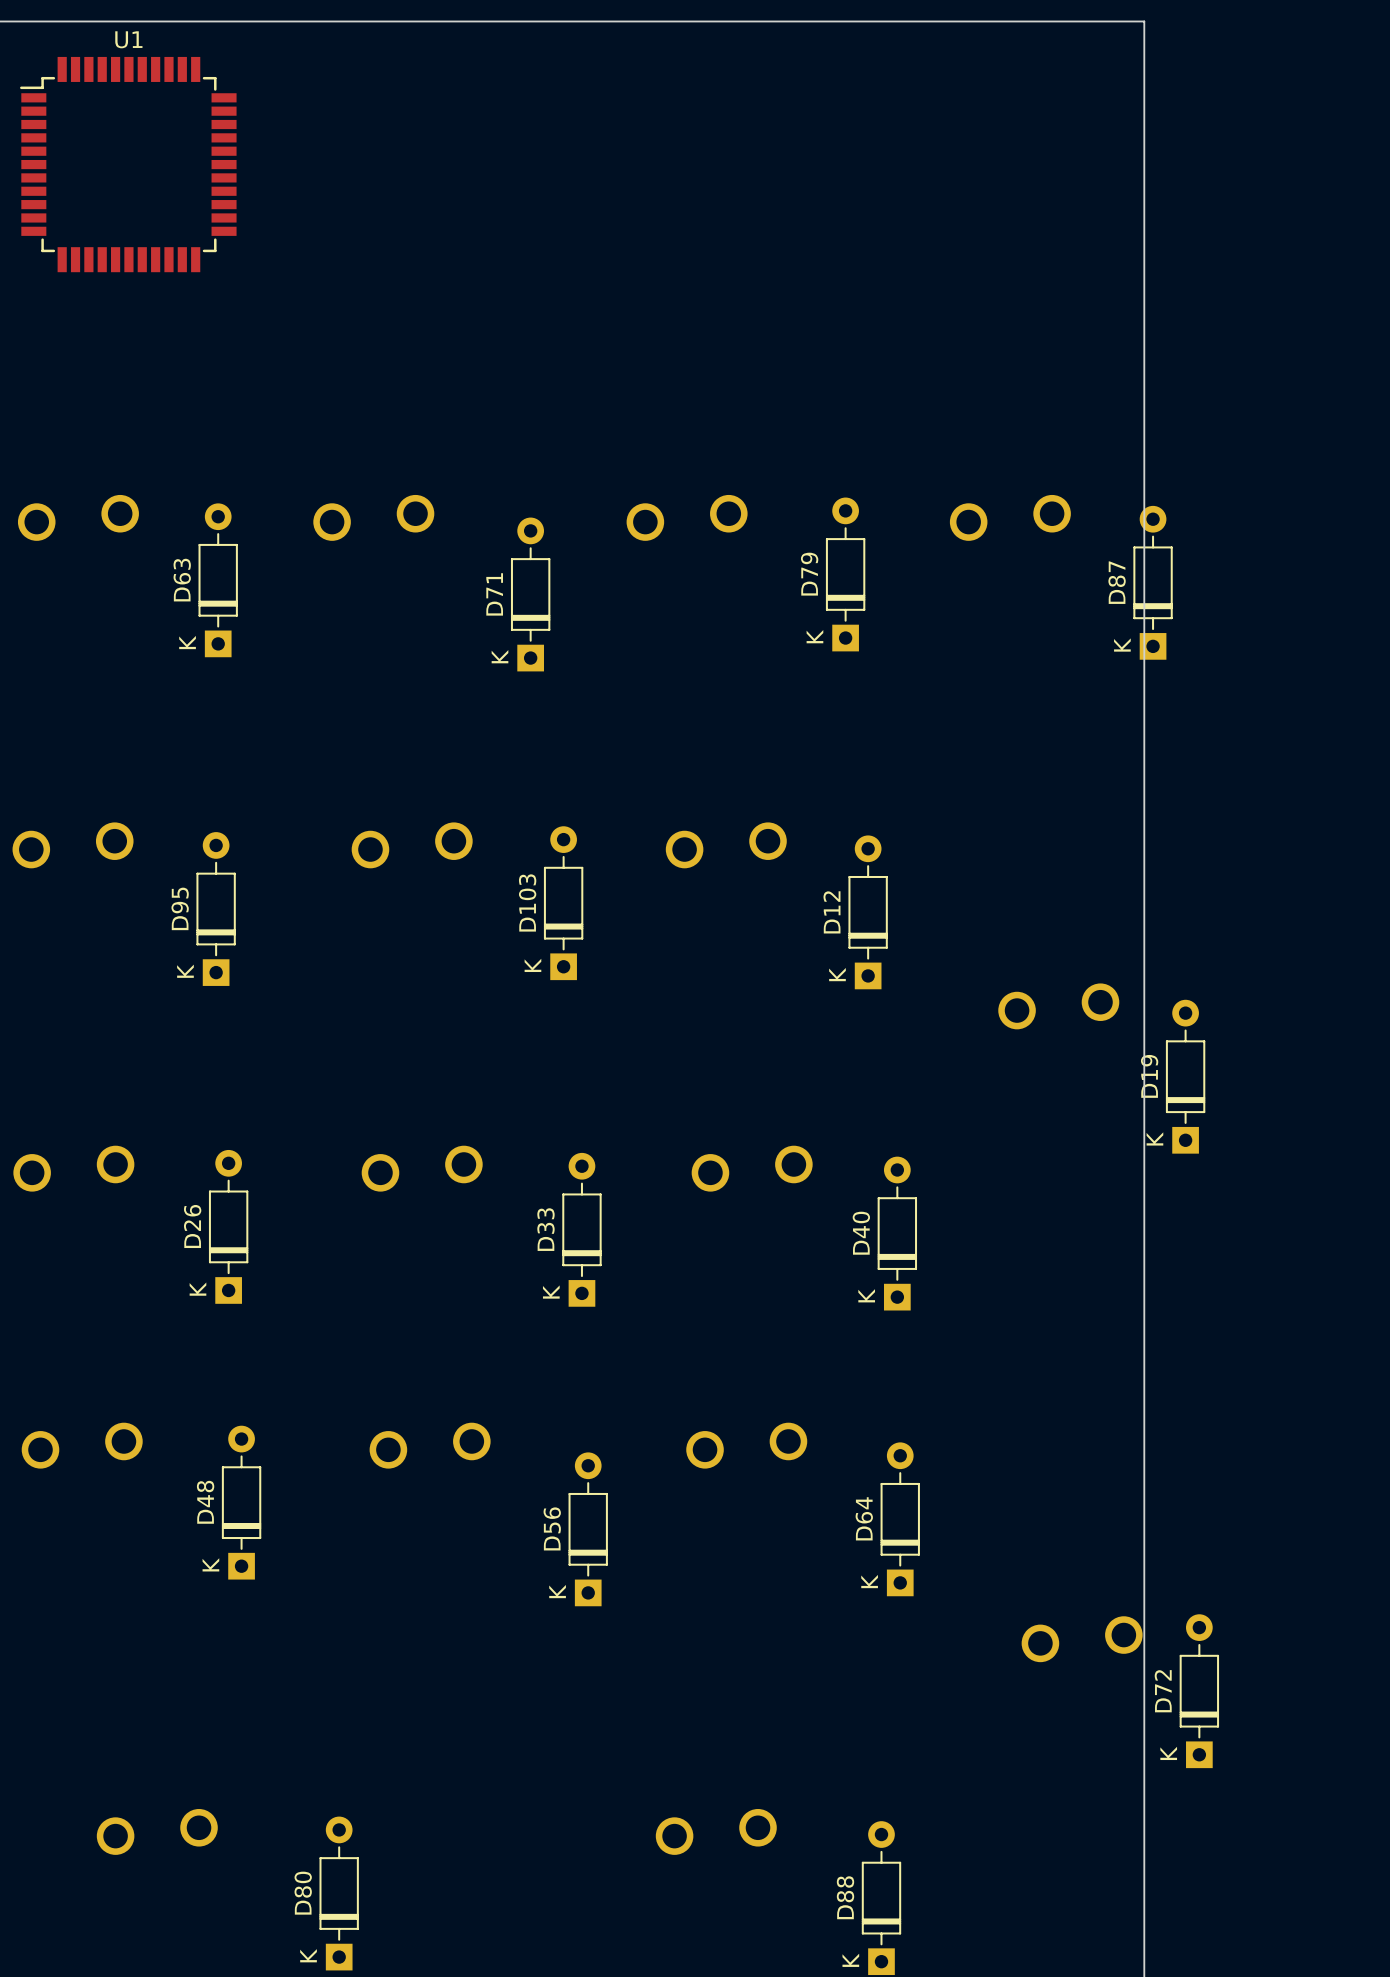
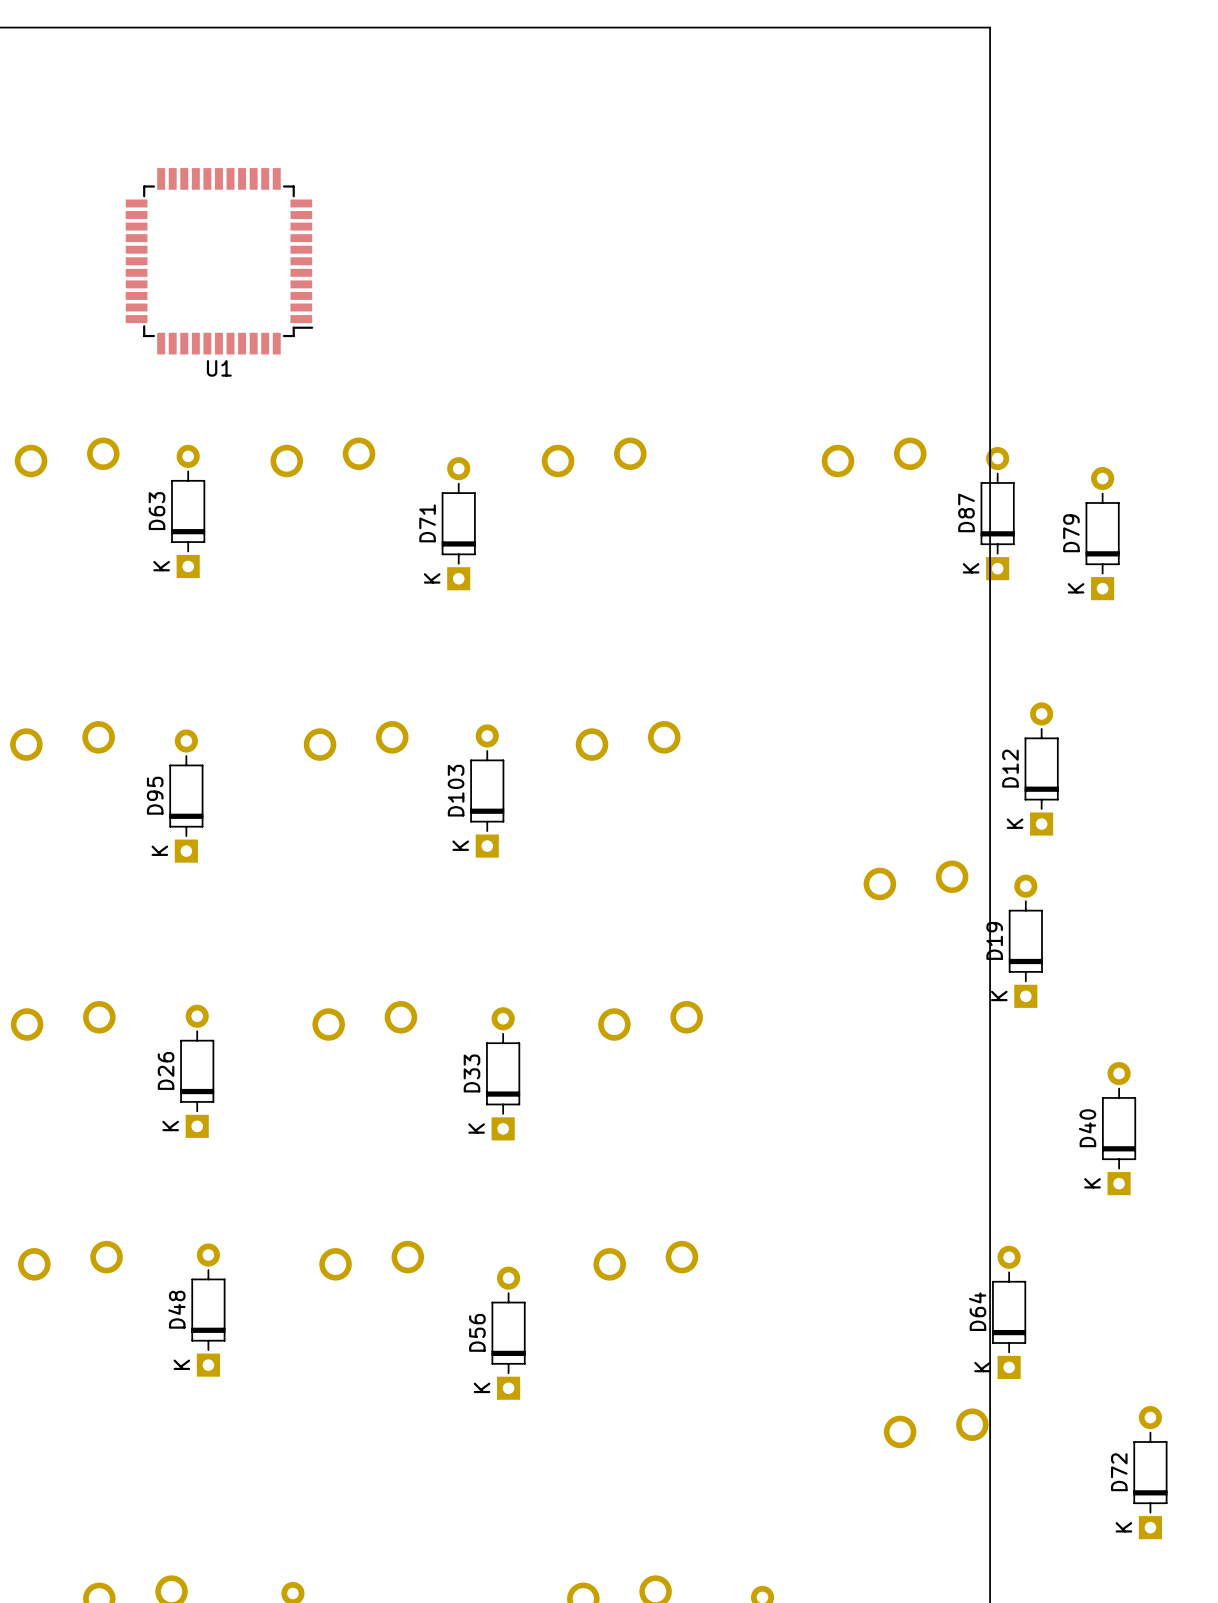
U1 rotation: 0° (128, 164) -> 180° (219, 261)
U1 position: (128, 164) -> (219, 261)
D79 position: (845, 574) -> (1102, 533)
D12 position: (868, 912) -> (1041, 768)
D40 position: (897, 1233) -> (1119, 1128)
D64 position: (900, 1519) -> (1009, 1312)
D72 position: (1199, 1691) -> (1150, 1472)

